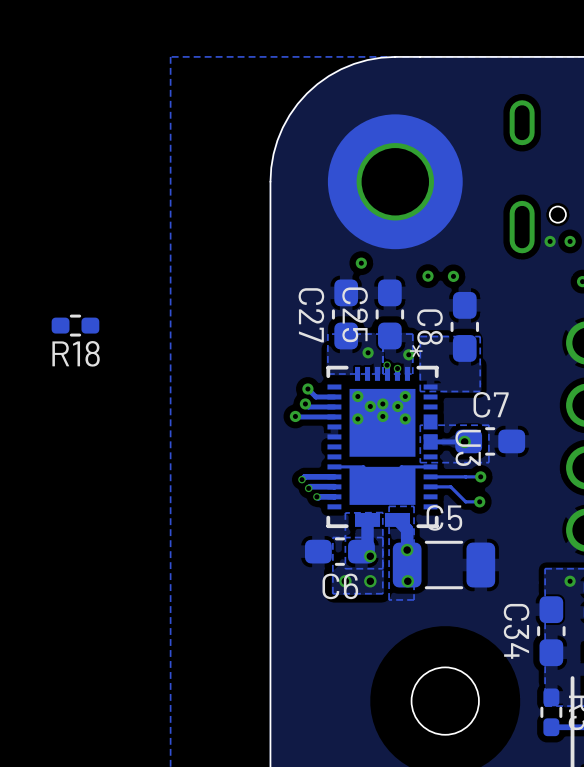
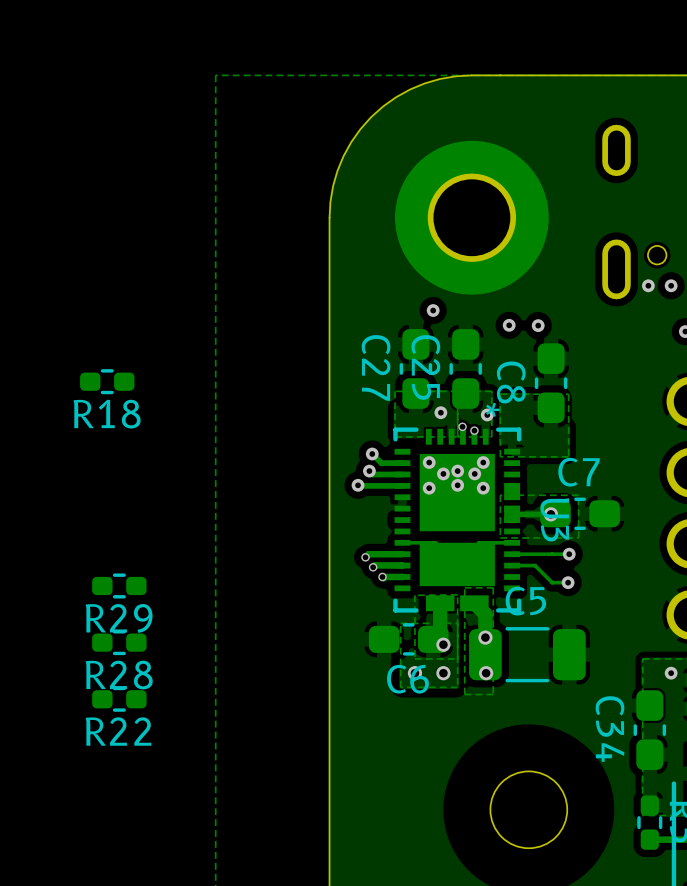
R29: none -> (119, 585)
R28: none -> (119, 642)
R22: none -> (119, 699)

